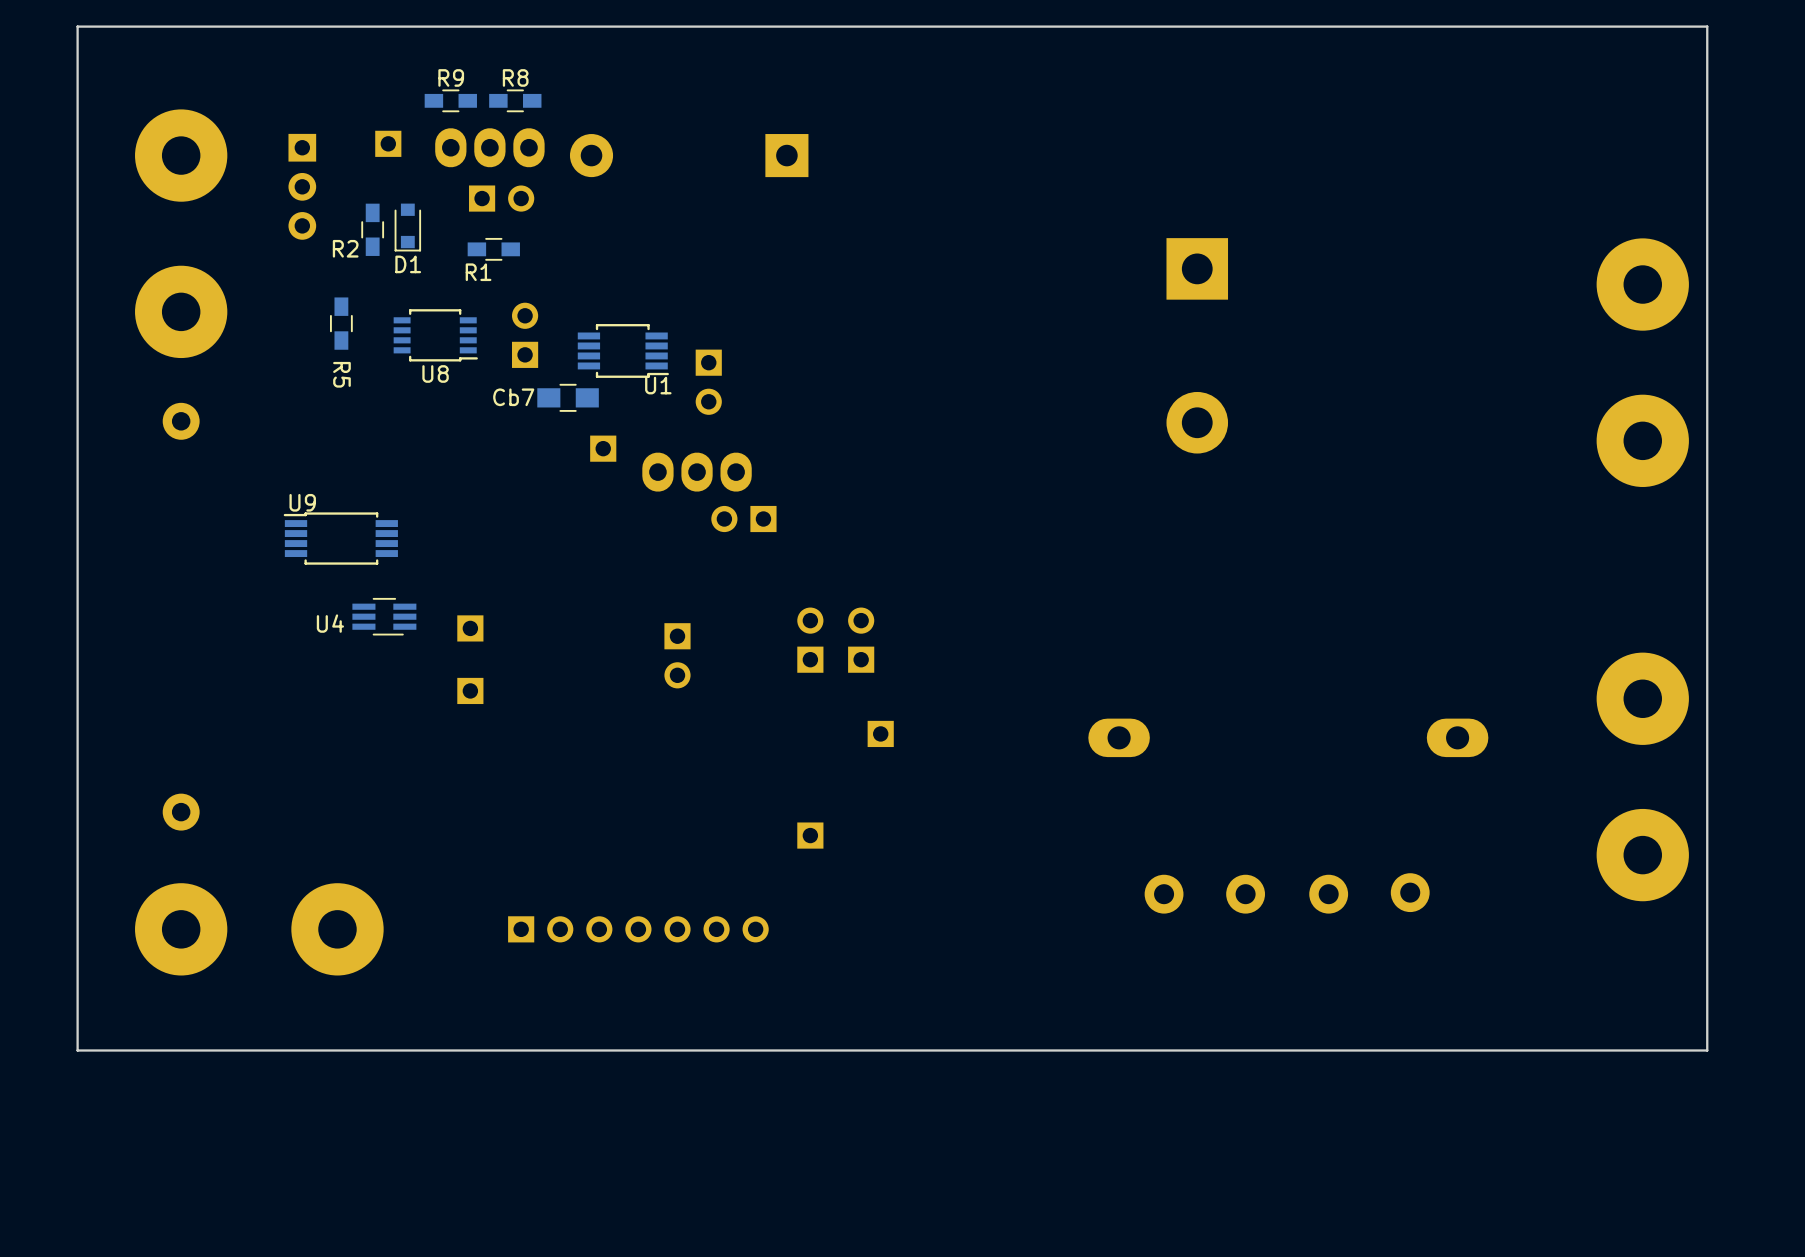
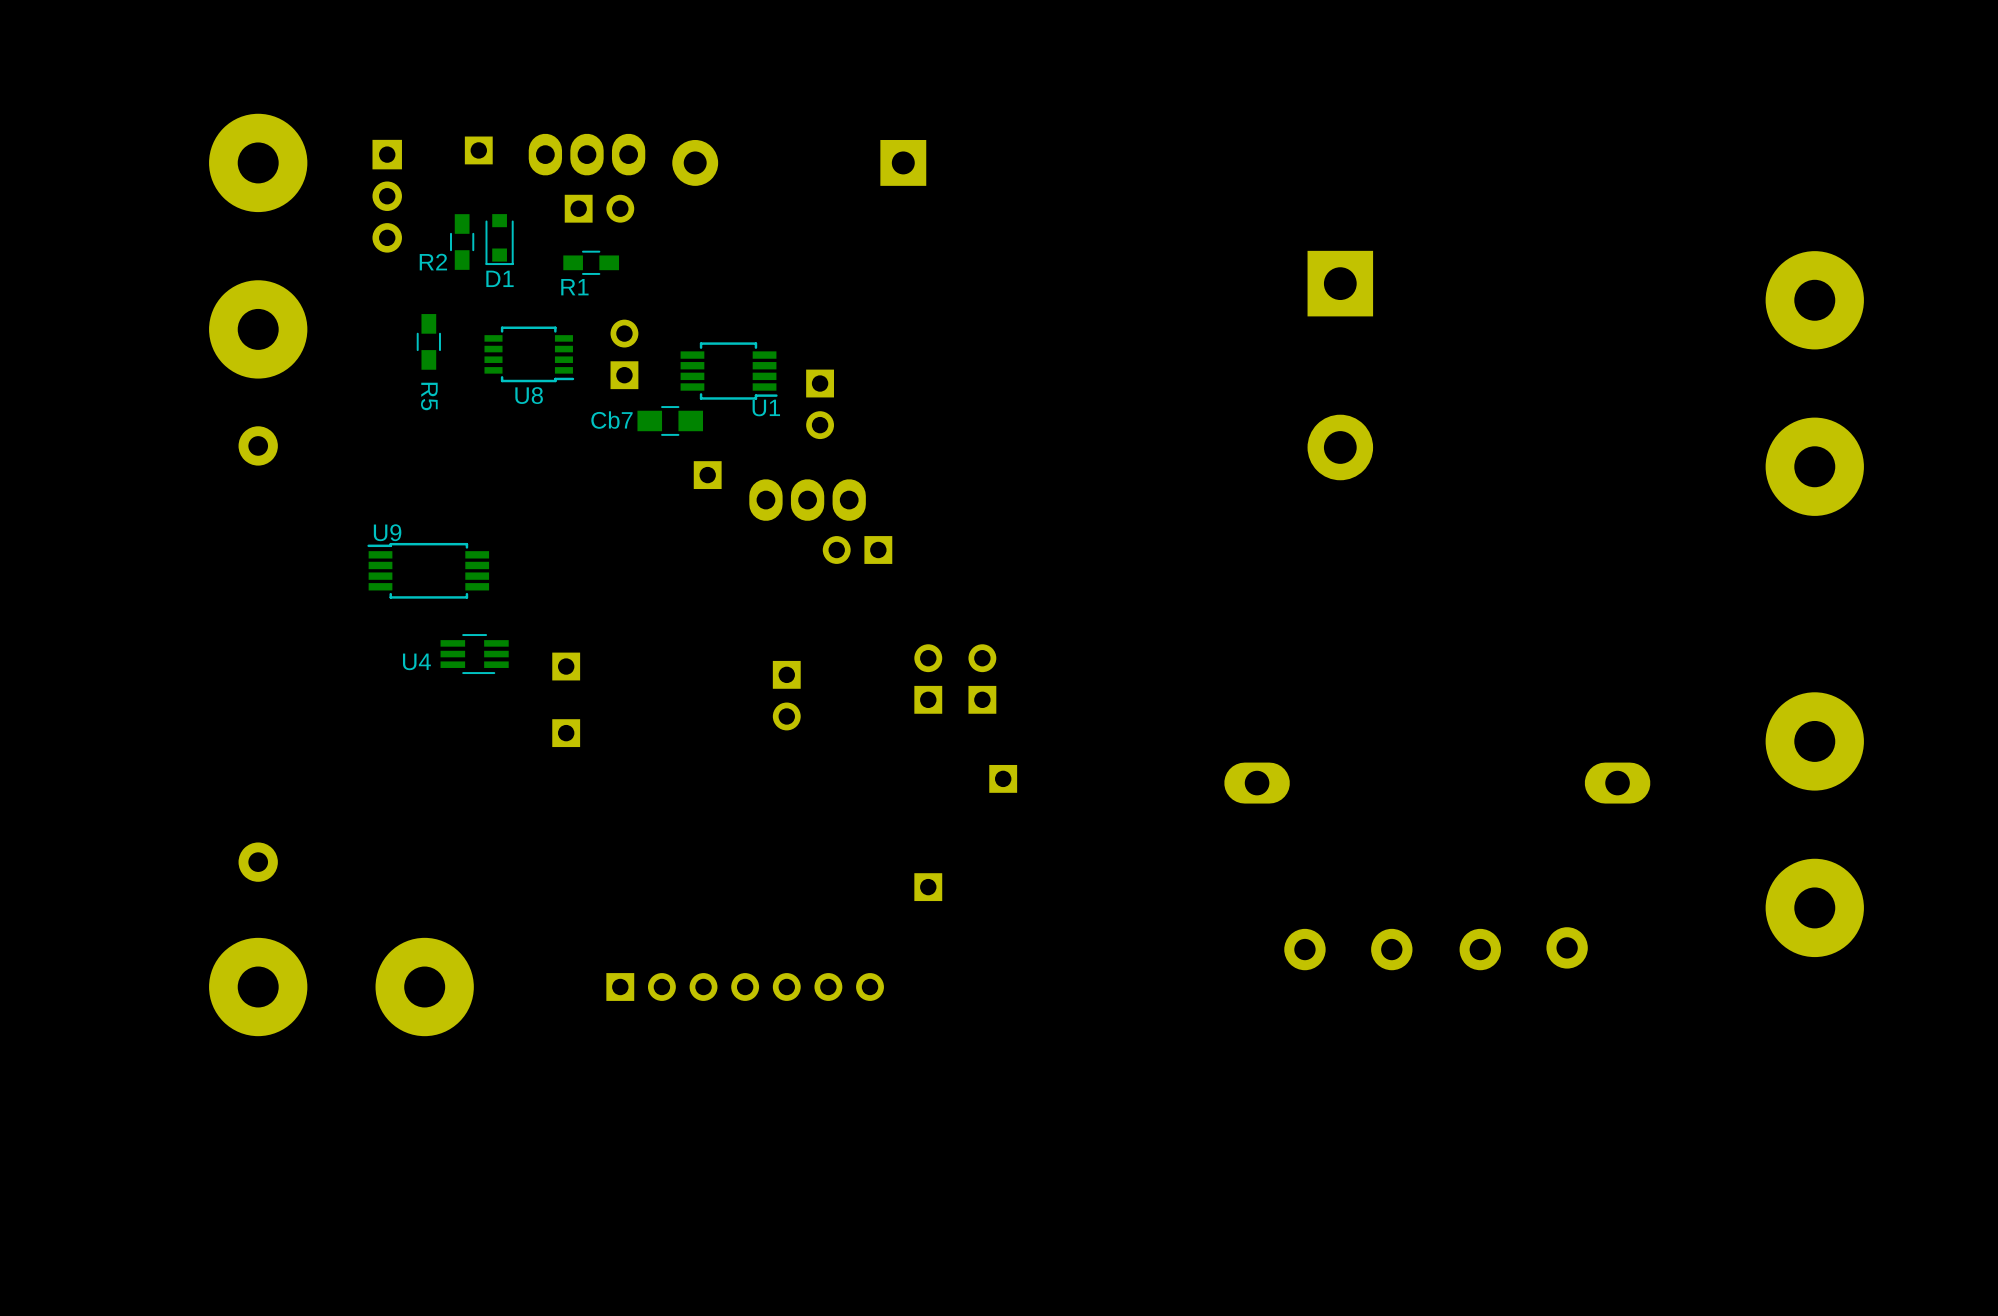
board edge: (1707, 26) (1707, 1050) (77, 1050) (77, 26) (1707, 26) -> none
R9: (450, 100) -> none
R8: (515, 100) -> none

